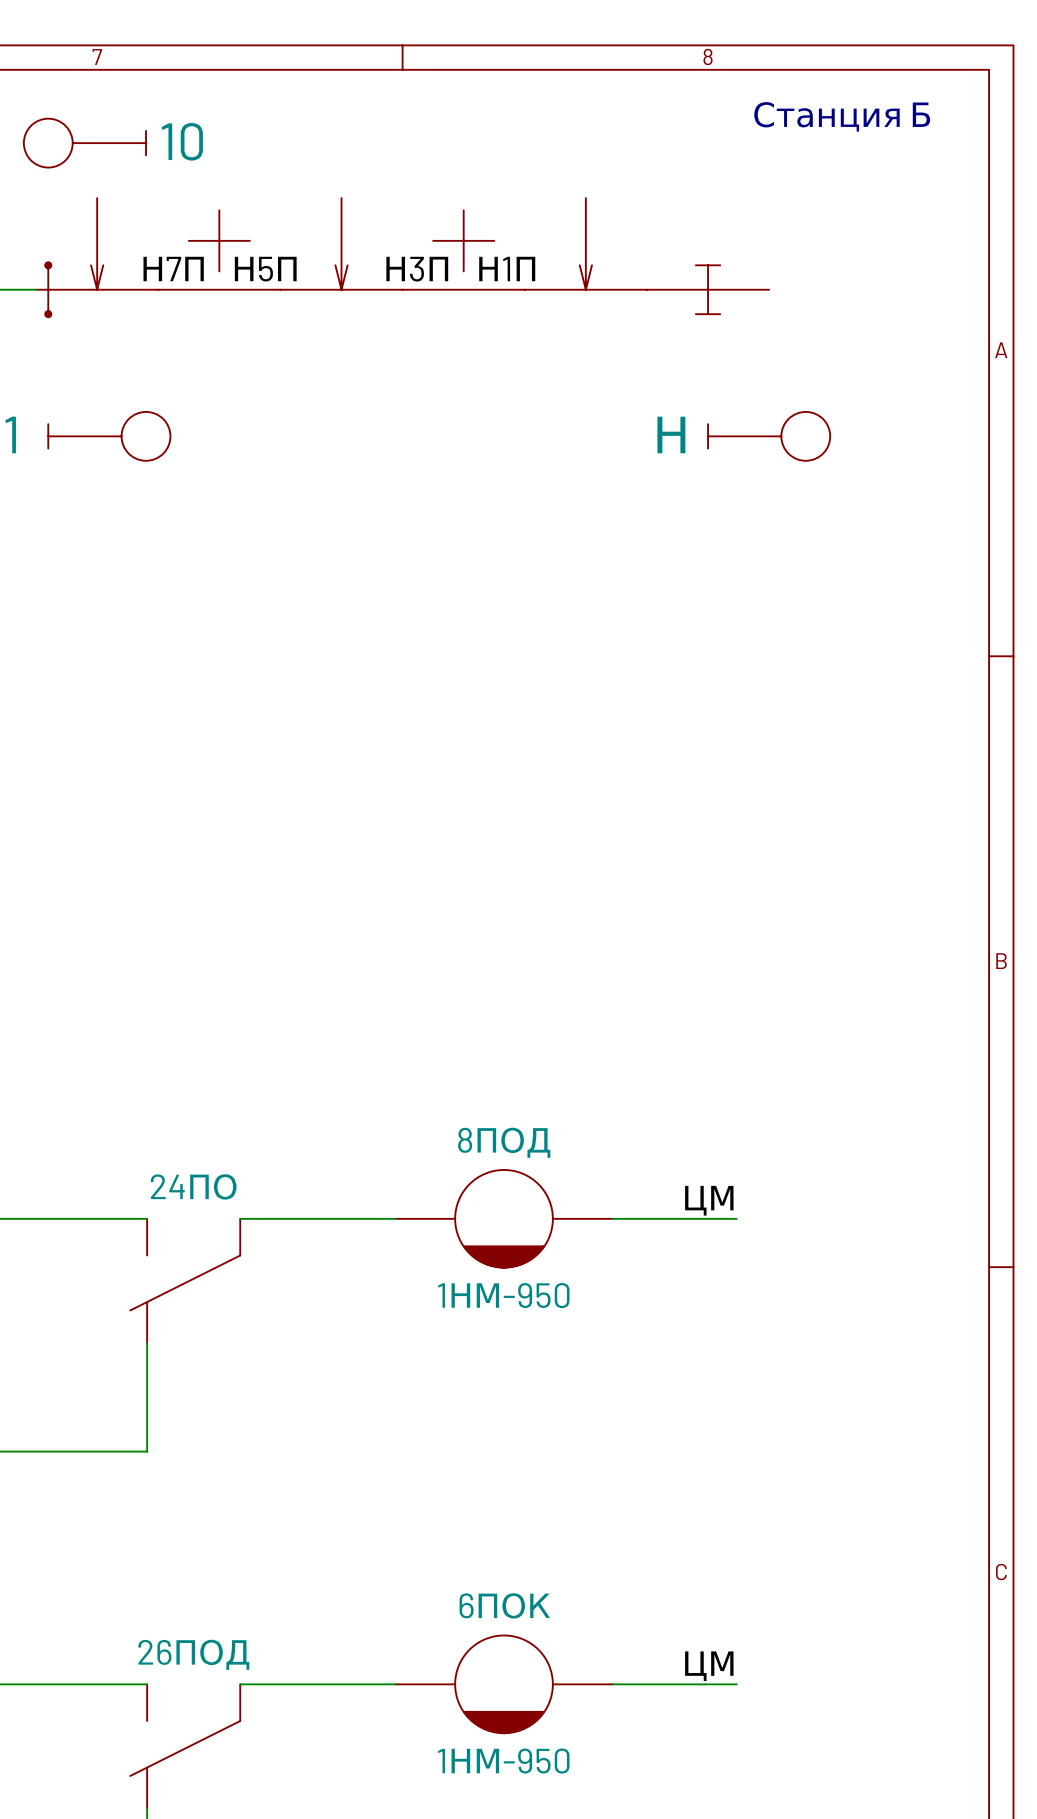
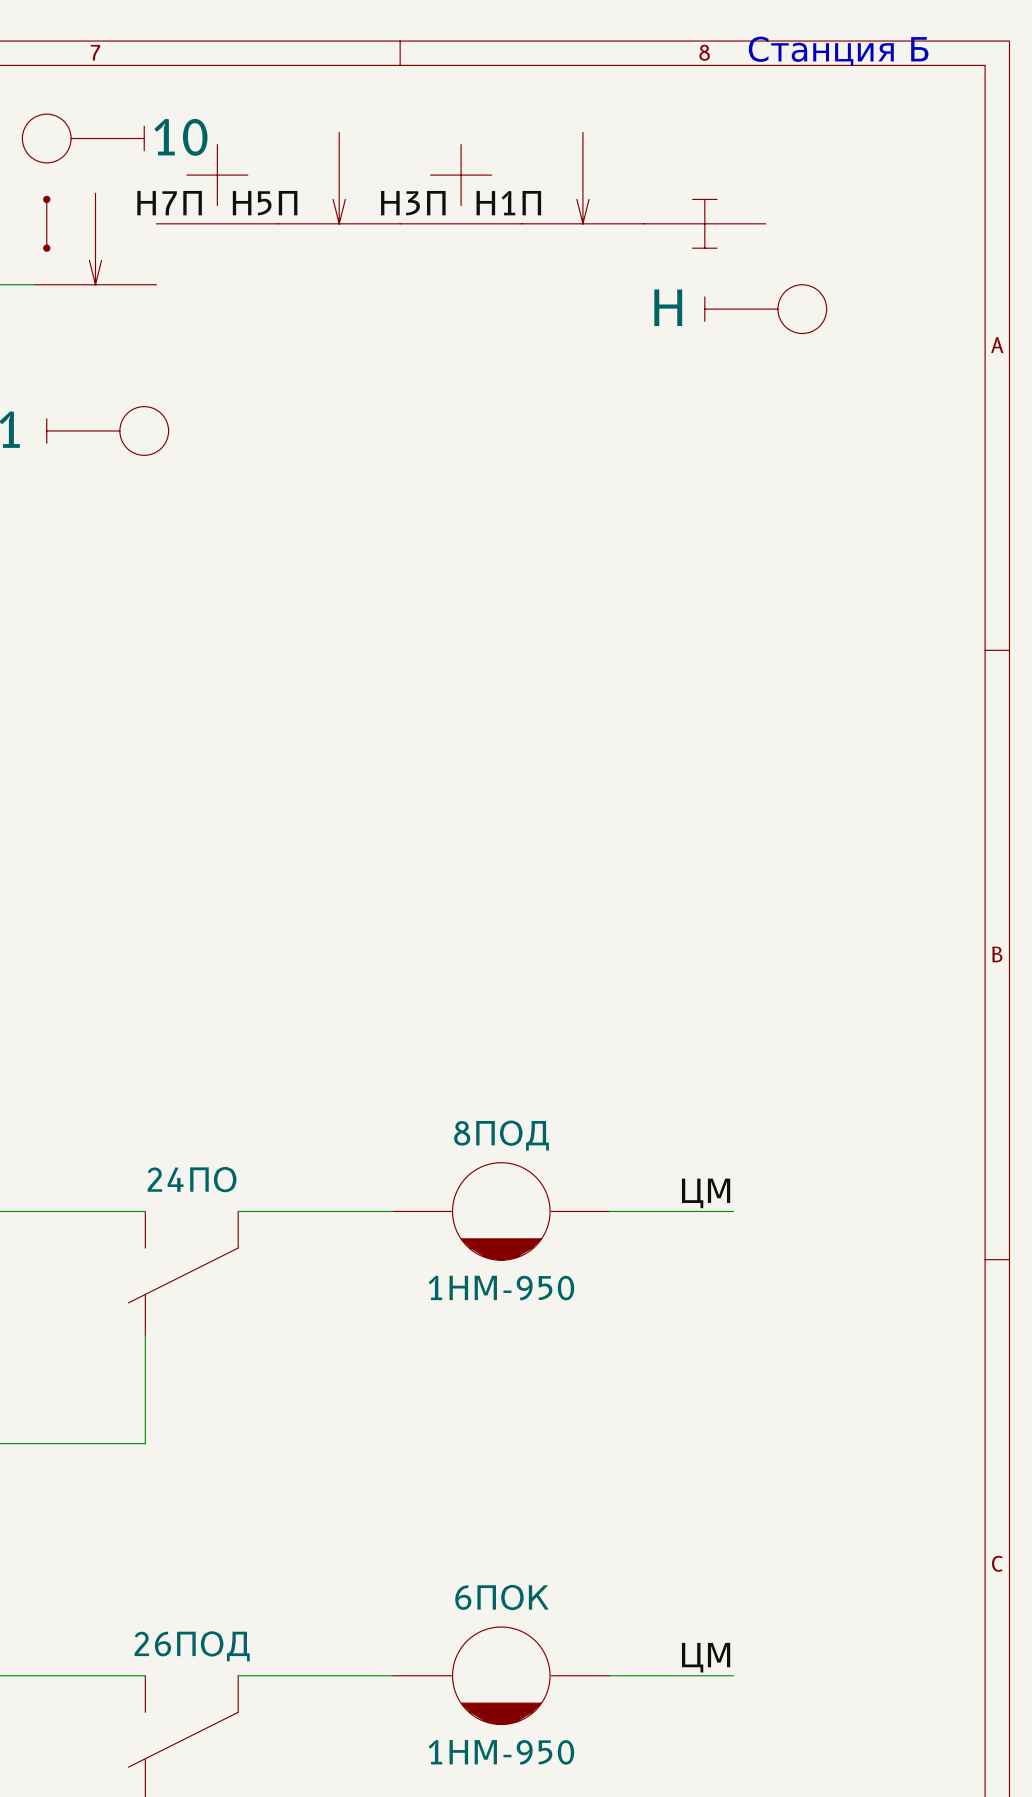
text position: Станция Б (842, 116) -> Станция Б (838, 51)
part position: (341, 243) -> (339, 178)
part position: (585, 243) -> (582, 178)
part position: (219, 250) -> (217, 184)
part position: (463, 250) -> (461, 184)
label position: Н7П (173, 269) -> Н7П (169, 203)
label position: Н5П (265, 269) -> Н5П (265, 203)
label position: Н3П (417, 269) -> Н3П (413, 203)
label position: Н1П (507, 269) -> Н1П (508, 203)
part position: (48, 289) -> (46, 223)
part position: (708, 289) -> (704, 223)
part position: (769, 436) -> (765, 309)

